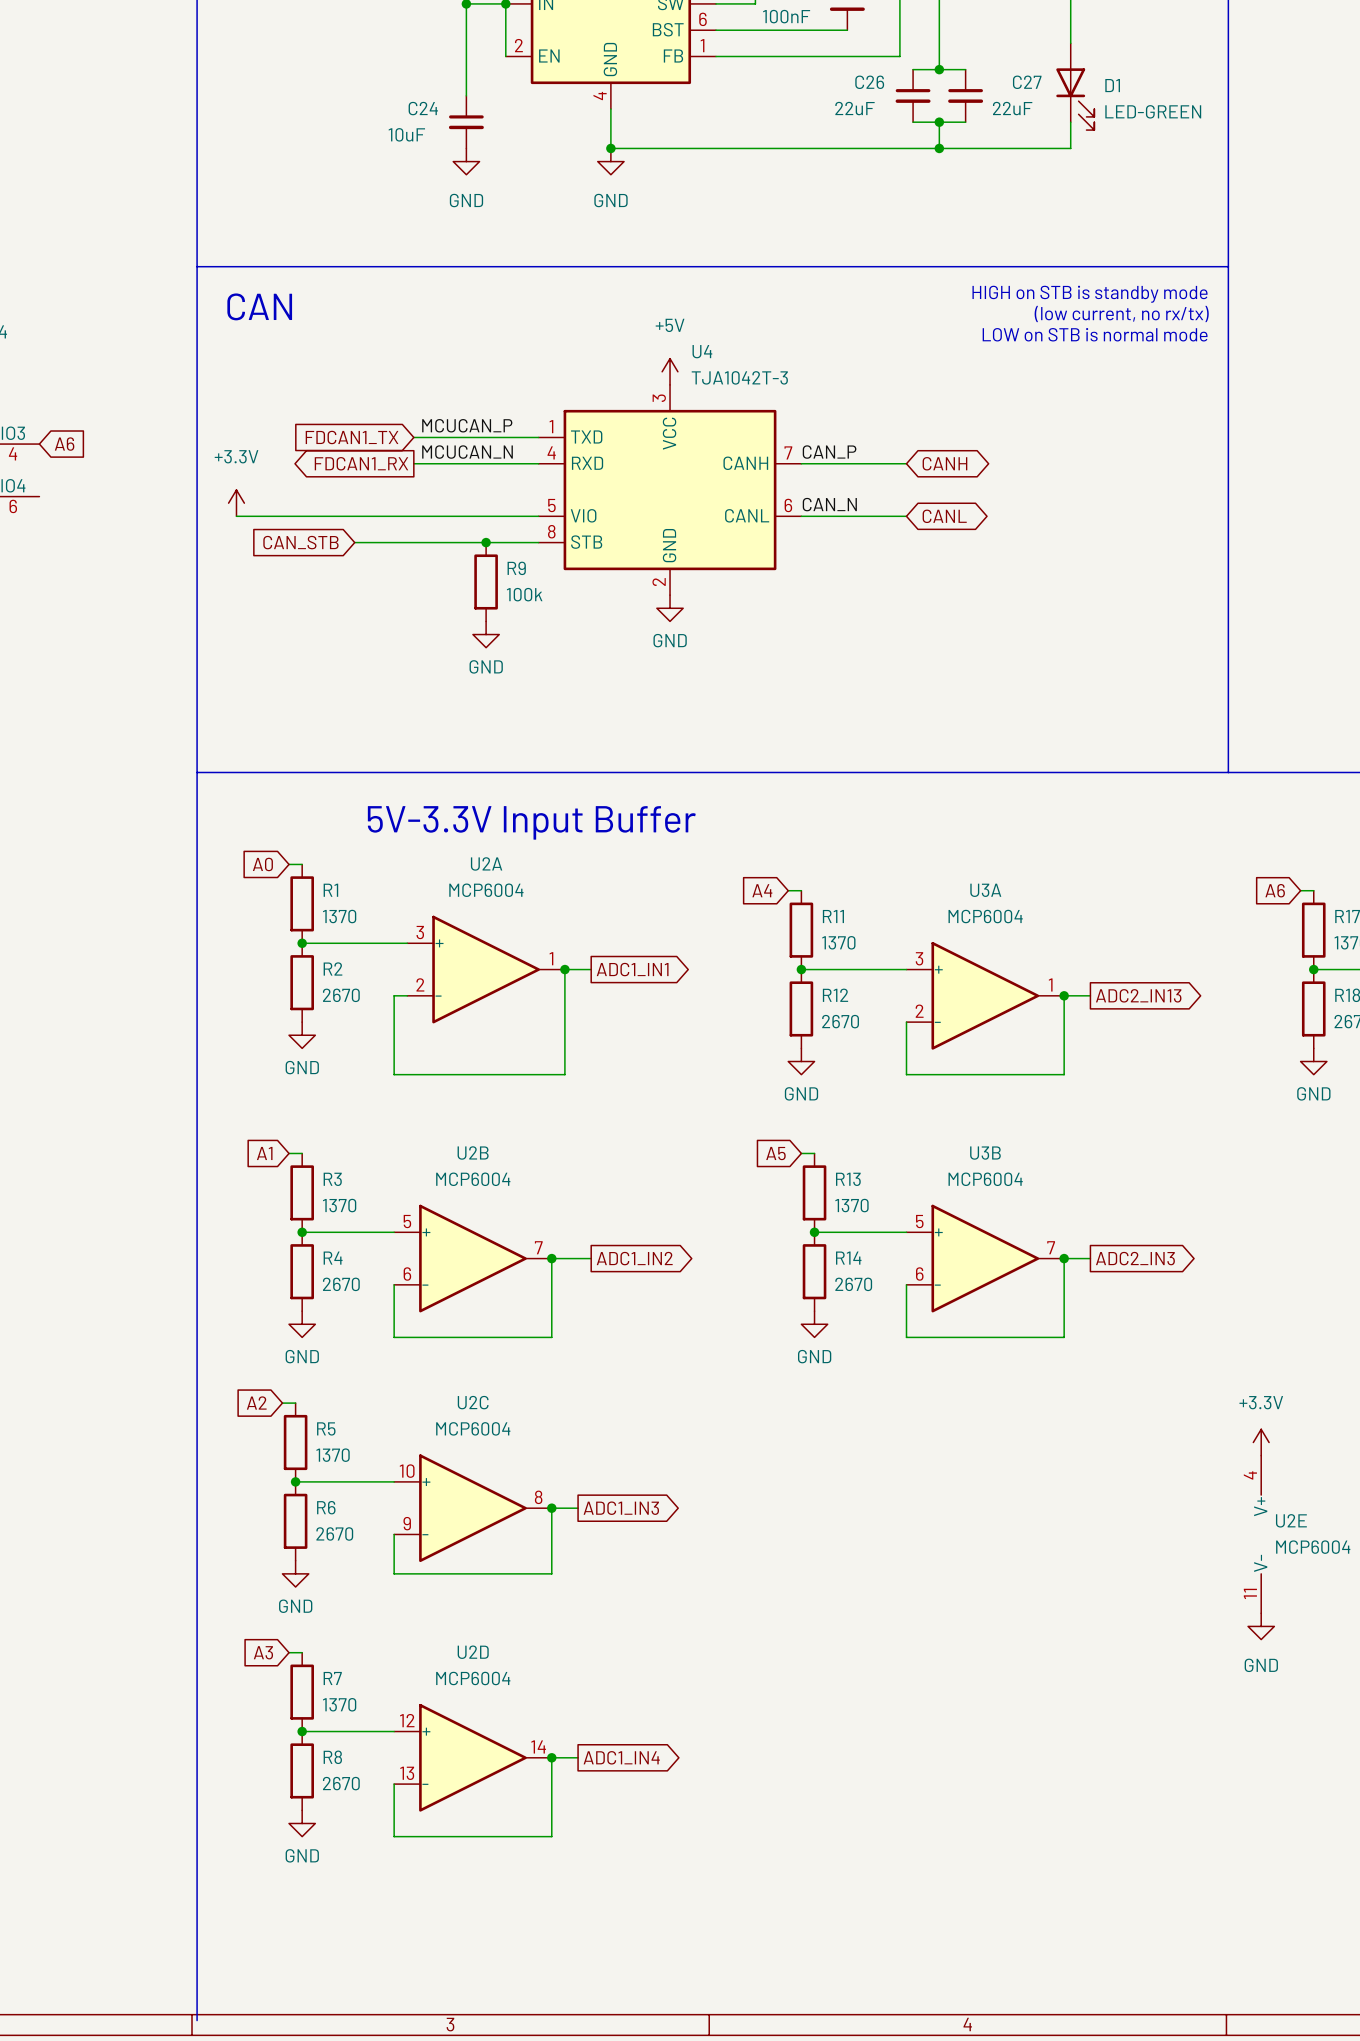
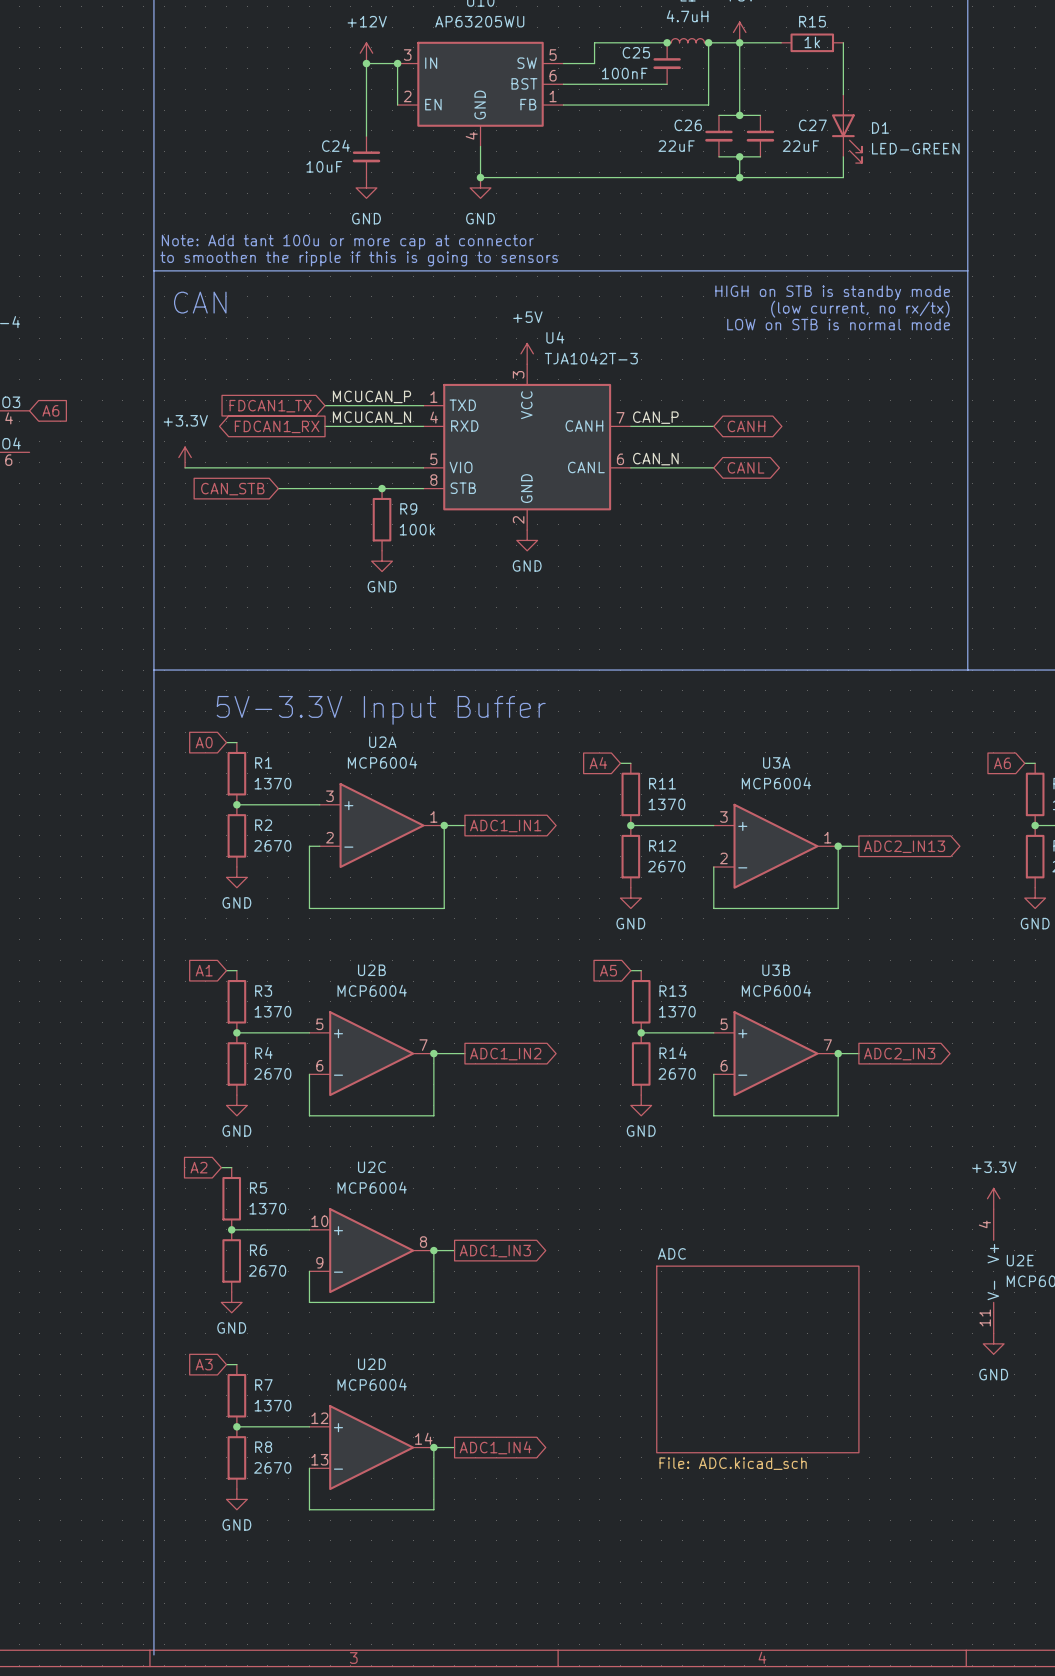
text: none -> Note: Add tant 100u or more cap at connector (347, 242)
text: none -> to smoothen the ripple if this is going to sensors (359, 258)
sheet ADC: none -> File: ADC.kicad_sch (757, 1359)

